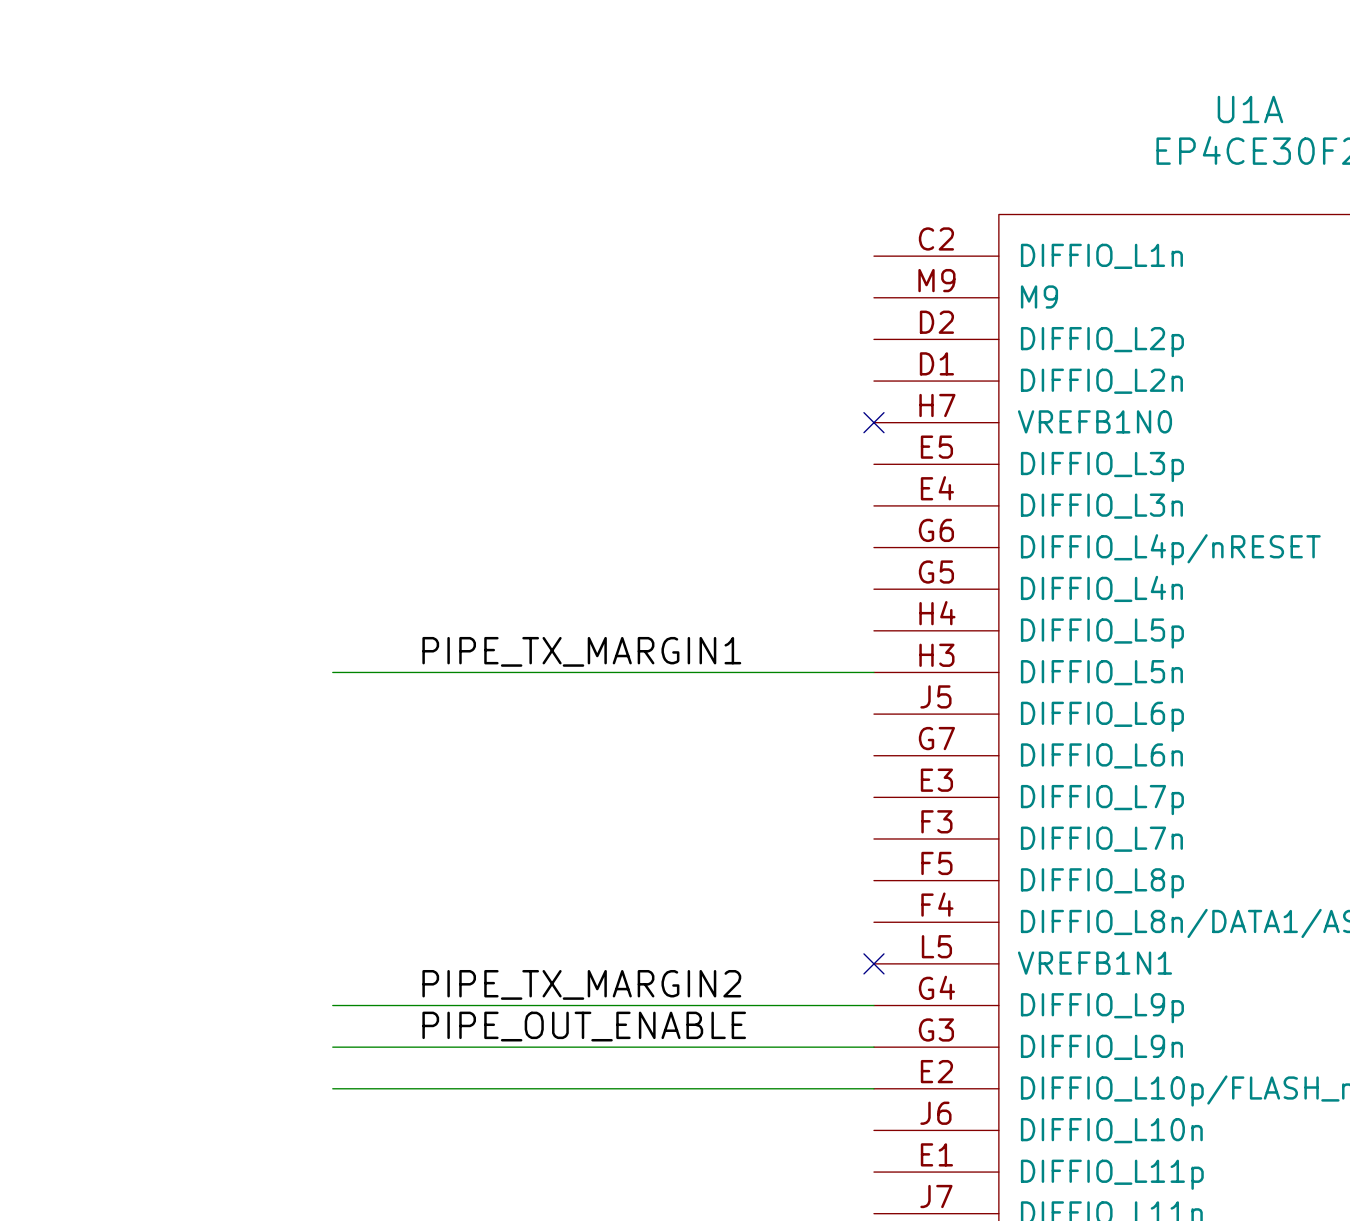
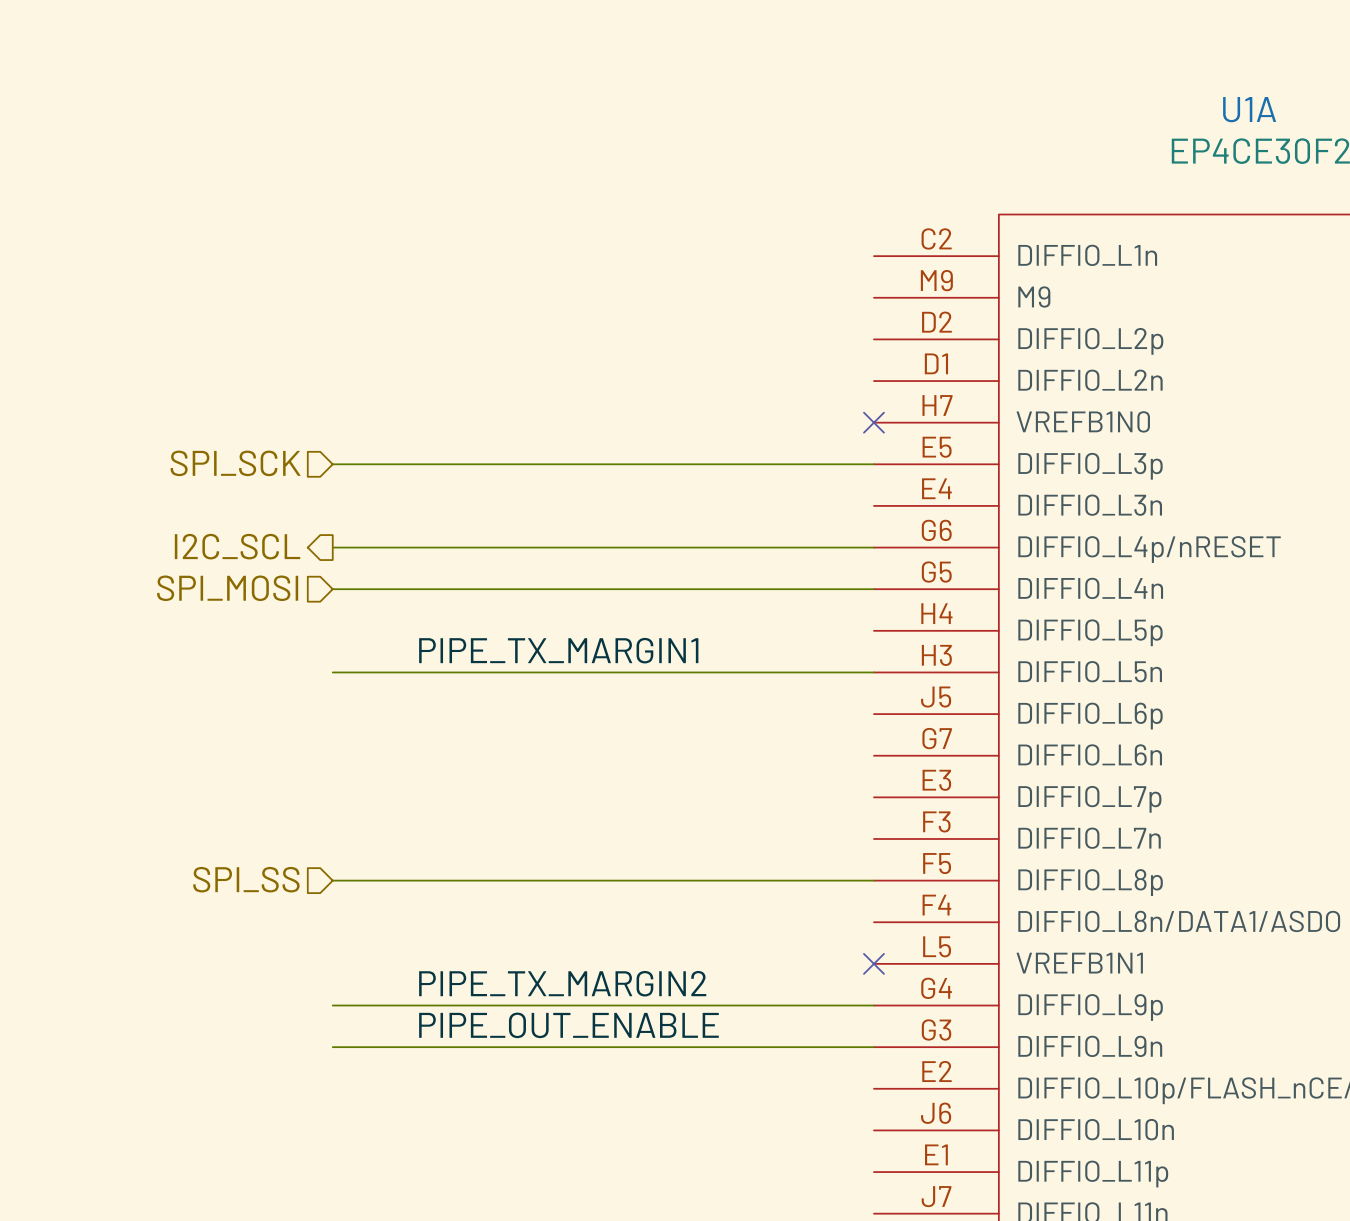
hierarchical label: none -> SPI_SCK (235, 463)
wire: none -> (332, 464) (873, 464)
hierarchical label: none -> I2C_SCL (237, 546)
wire: none -> (332, 547) (873, 547)
hierarchical label: none -> SPI_MOSI (227, 588)
wire: none -> (332, 589) (873, 589)
hierarchical label: none -> SPI_SS (246, 879)
wire: (332, 1088) (873, 1088) -> (332, 880) (873, 880)

